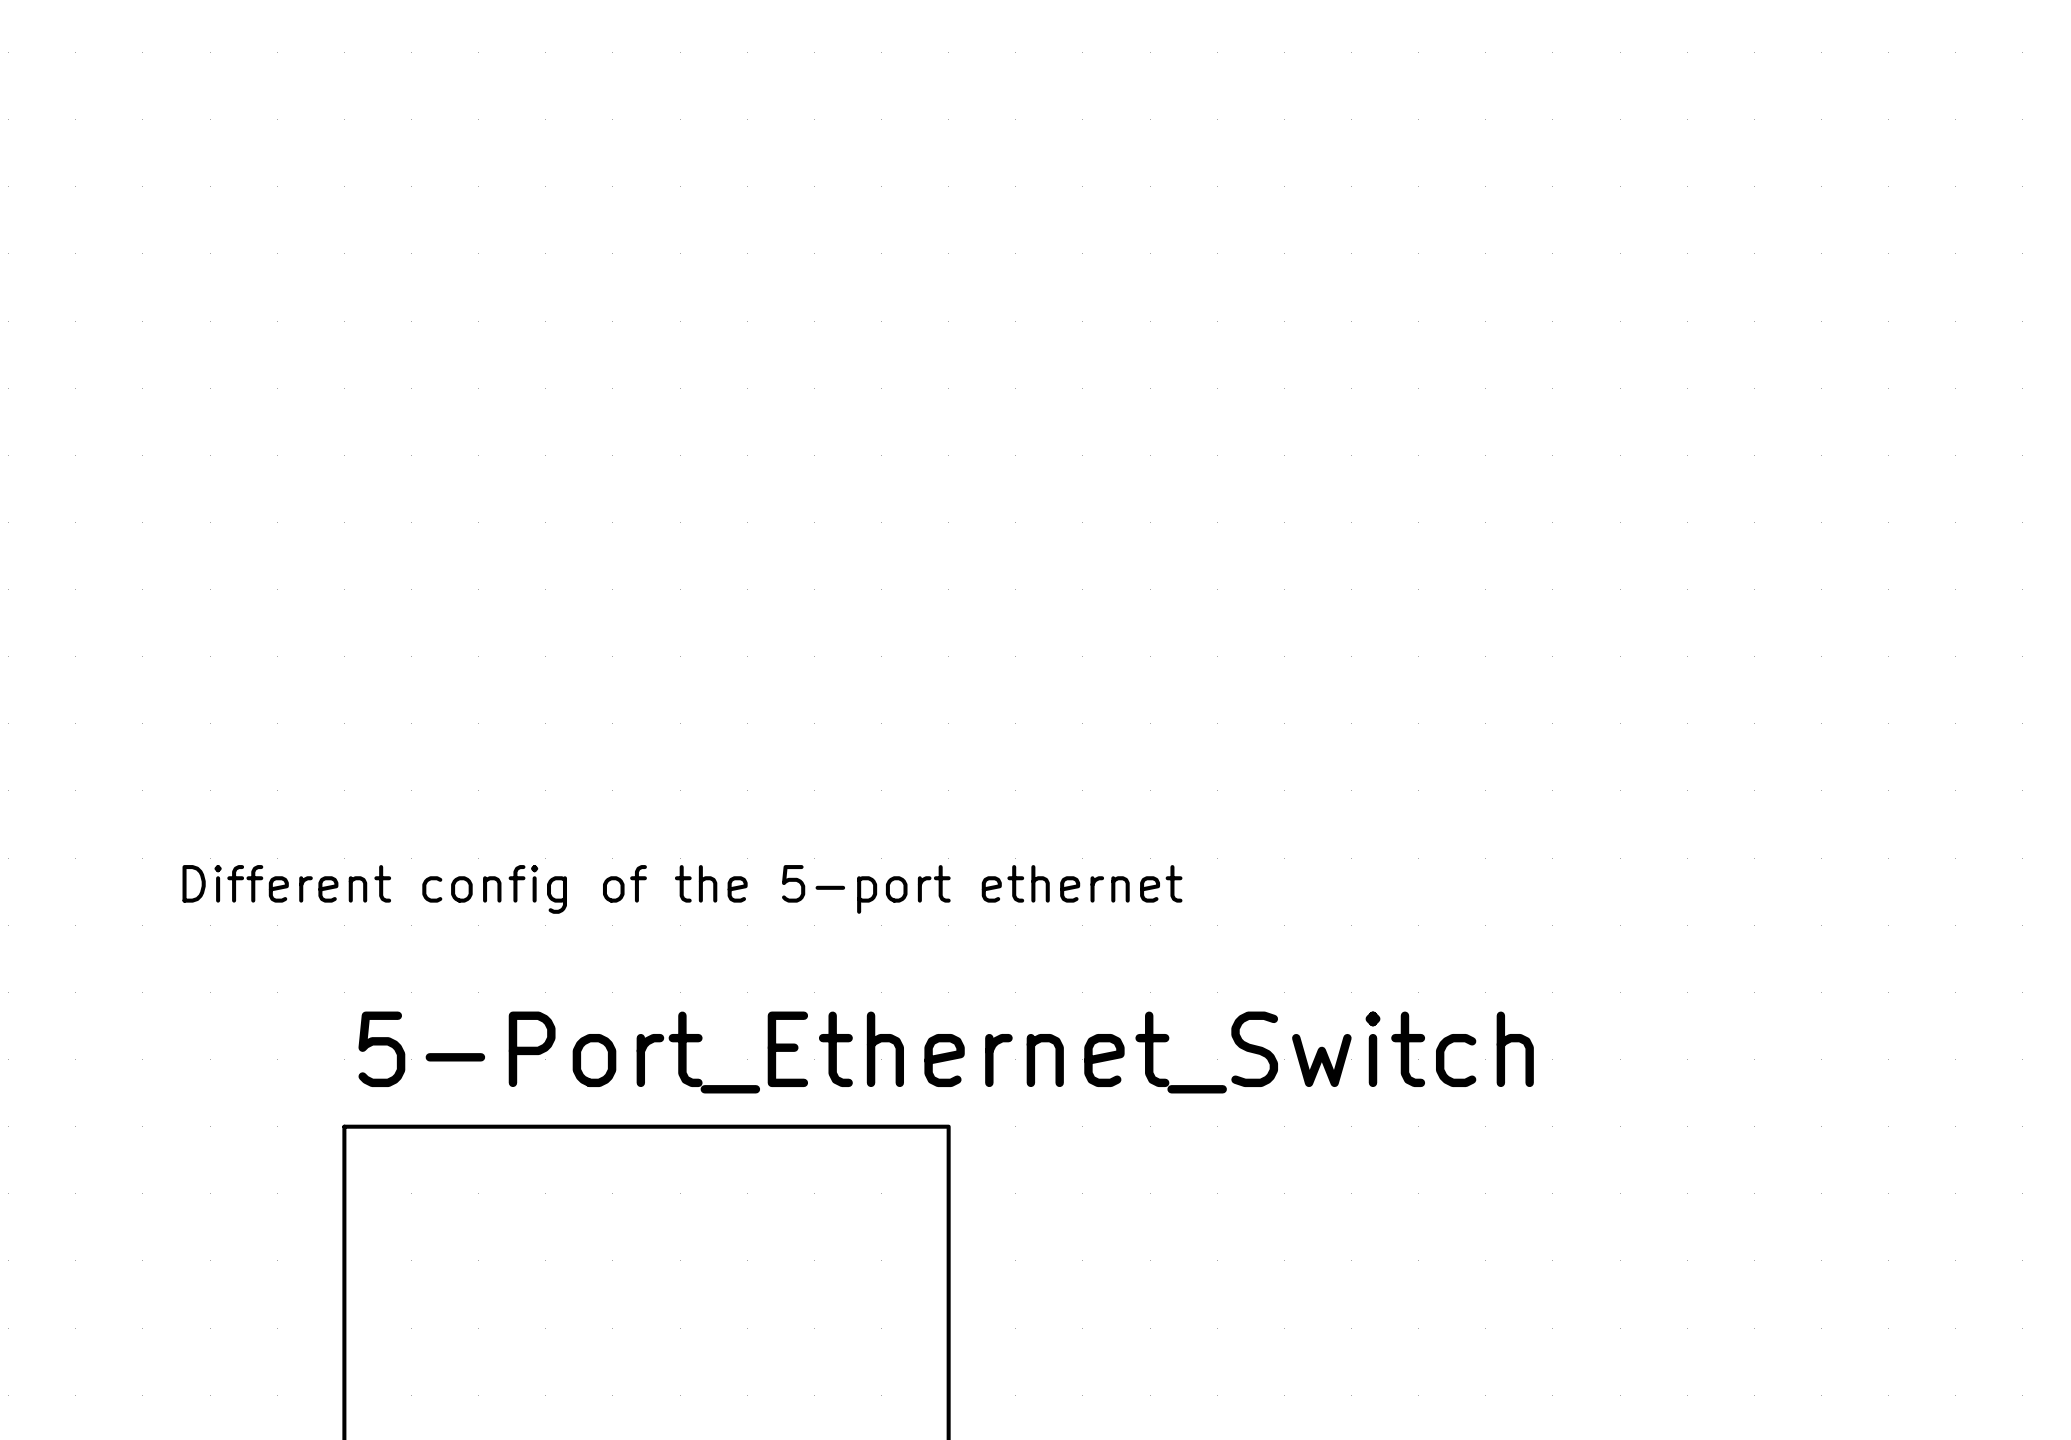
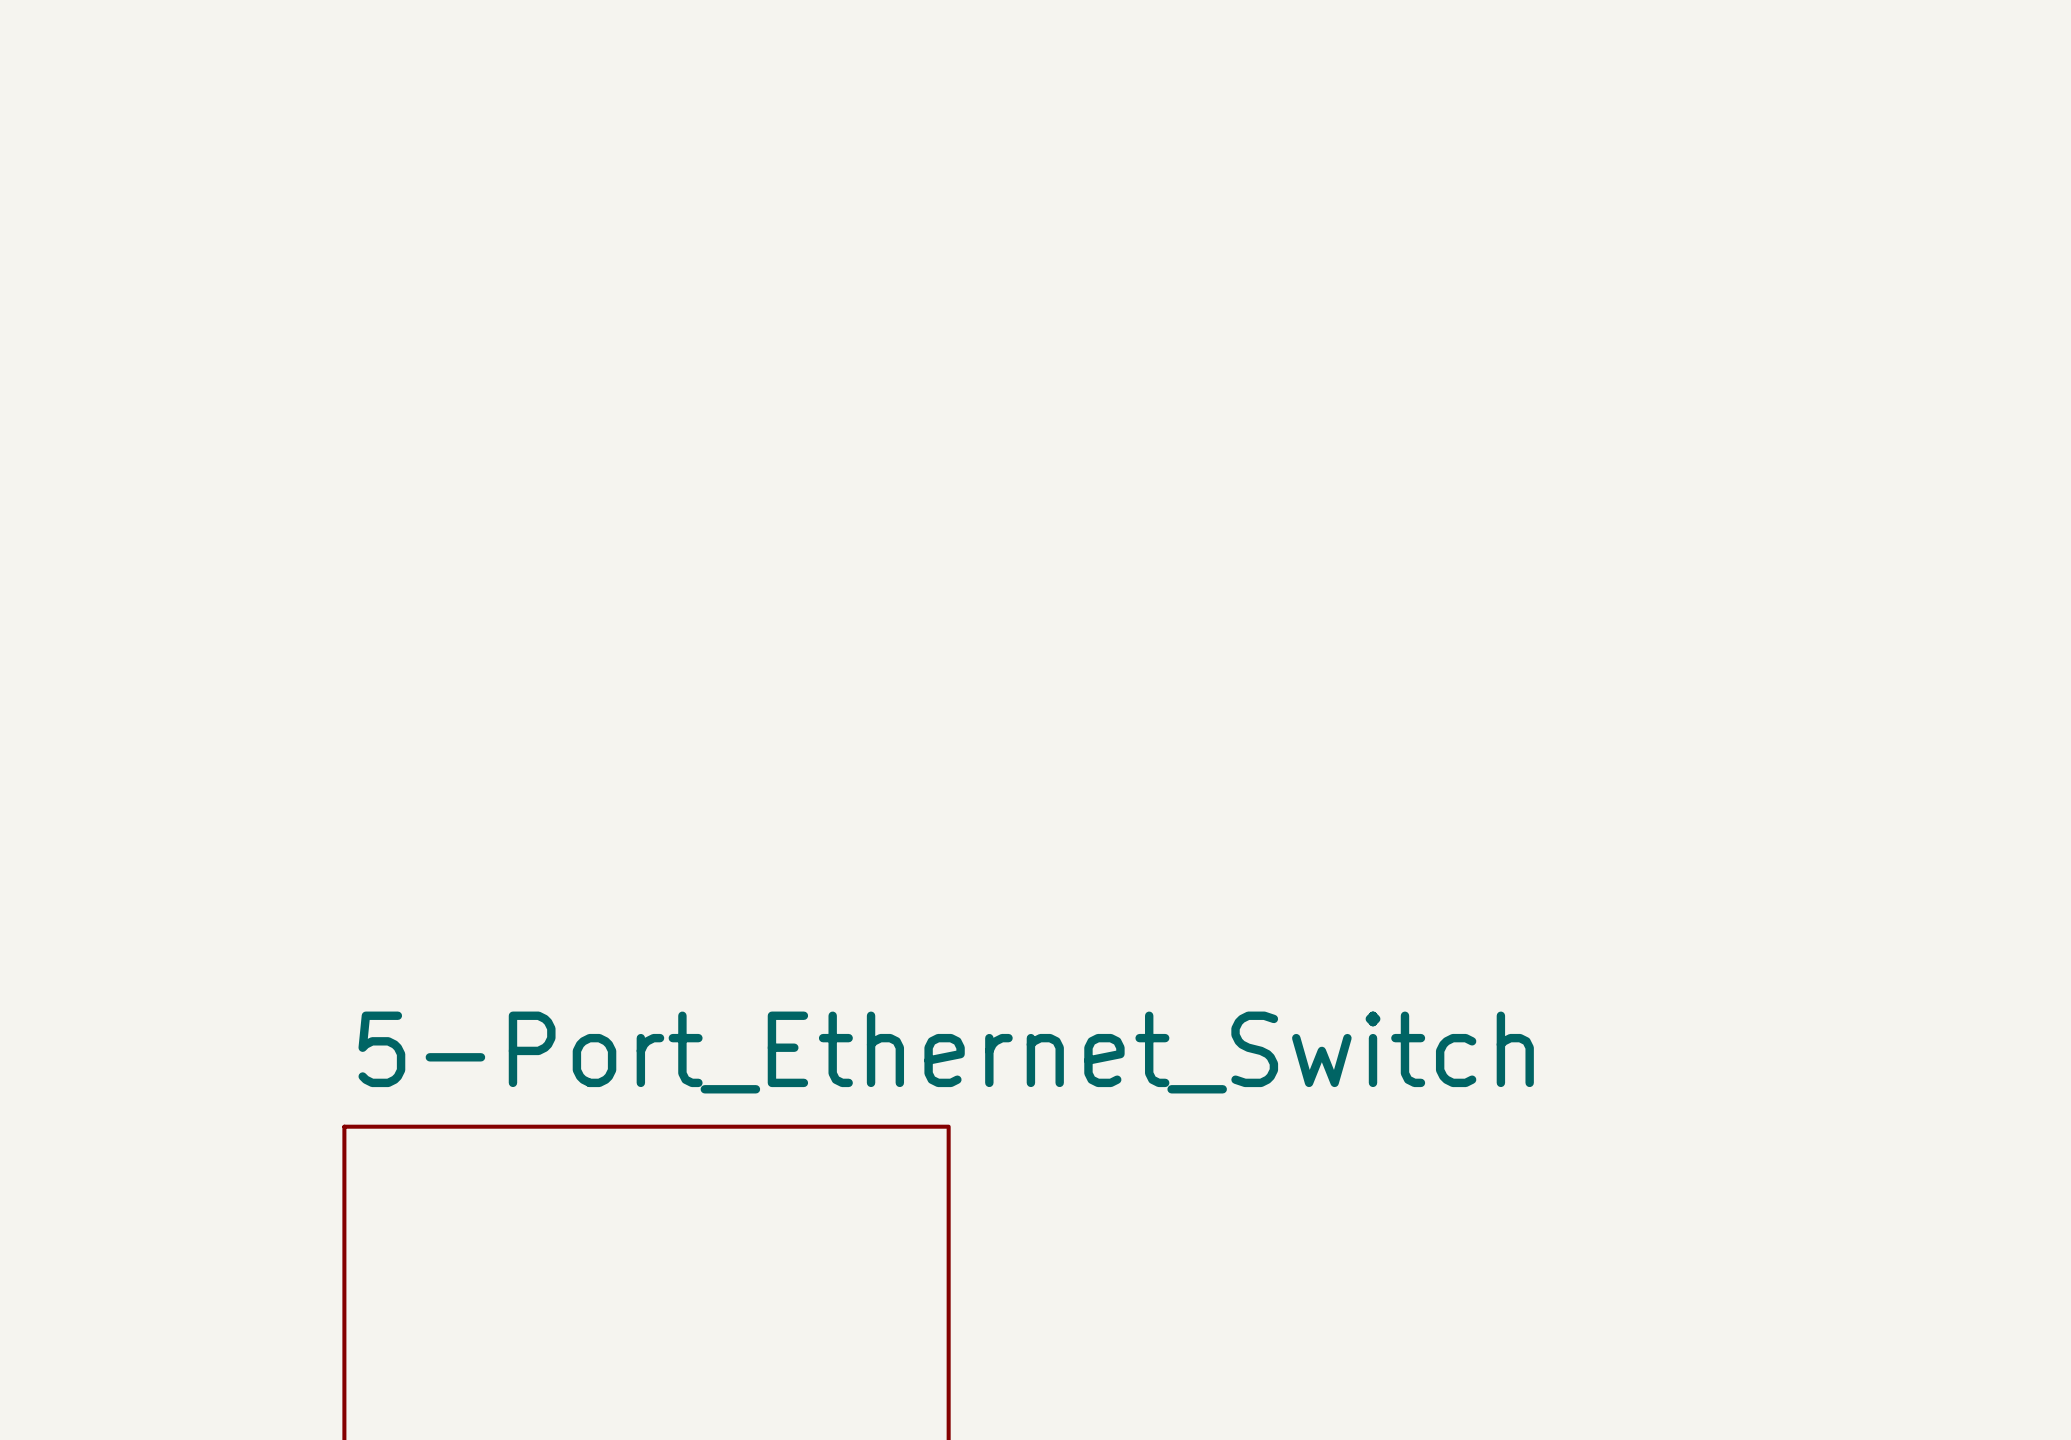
text: Different config of the 5-port ethernet (682, 889) -> none

